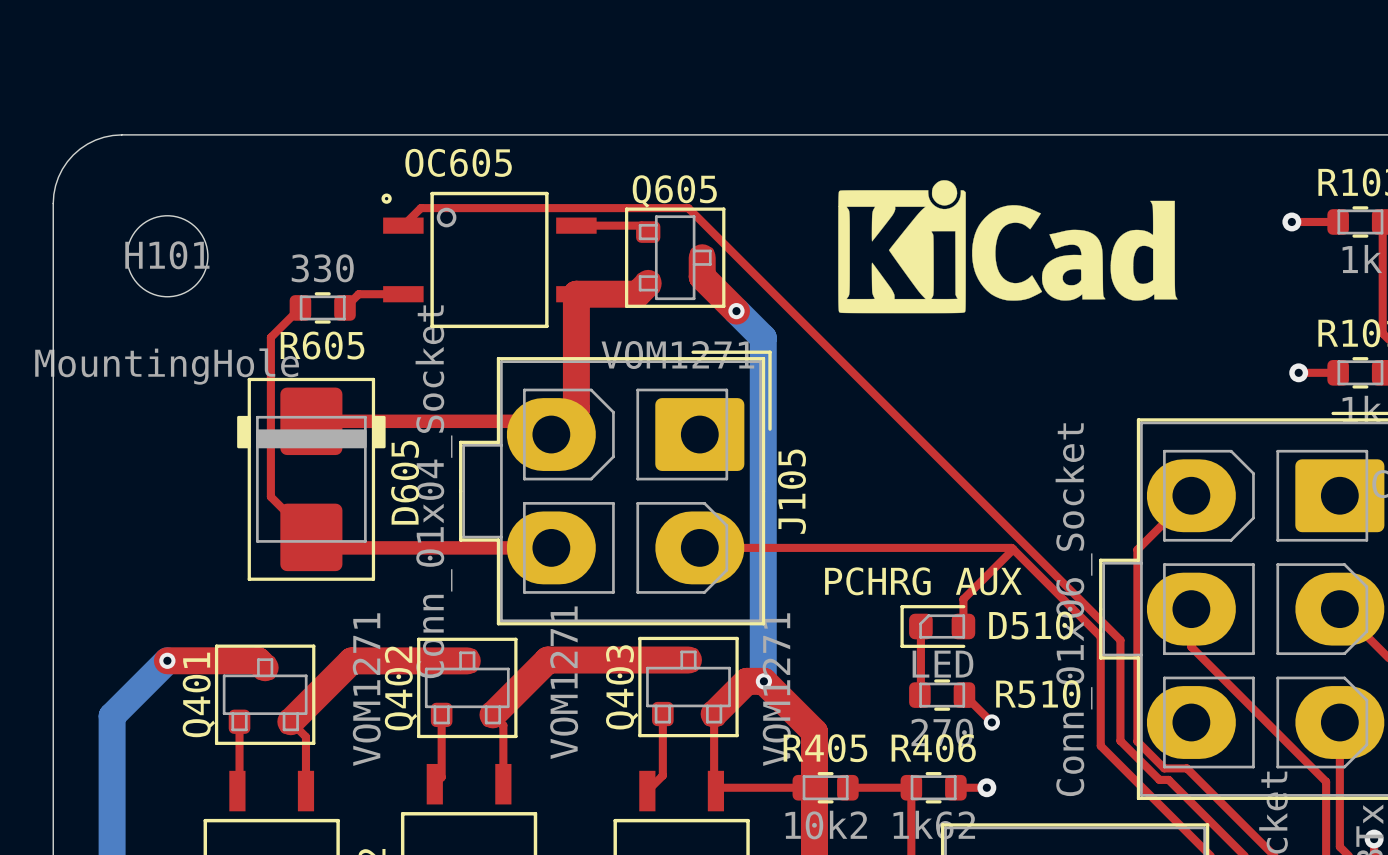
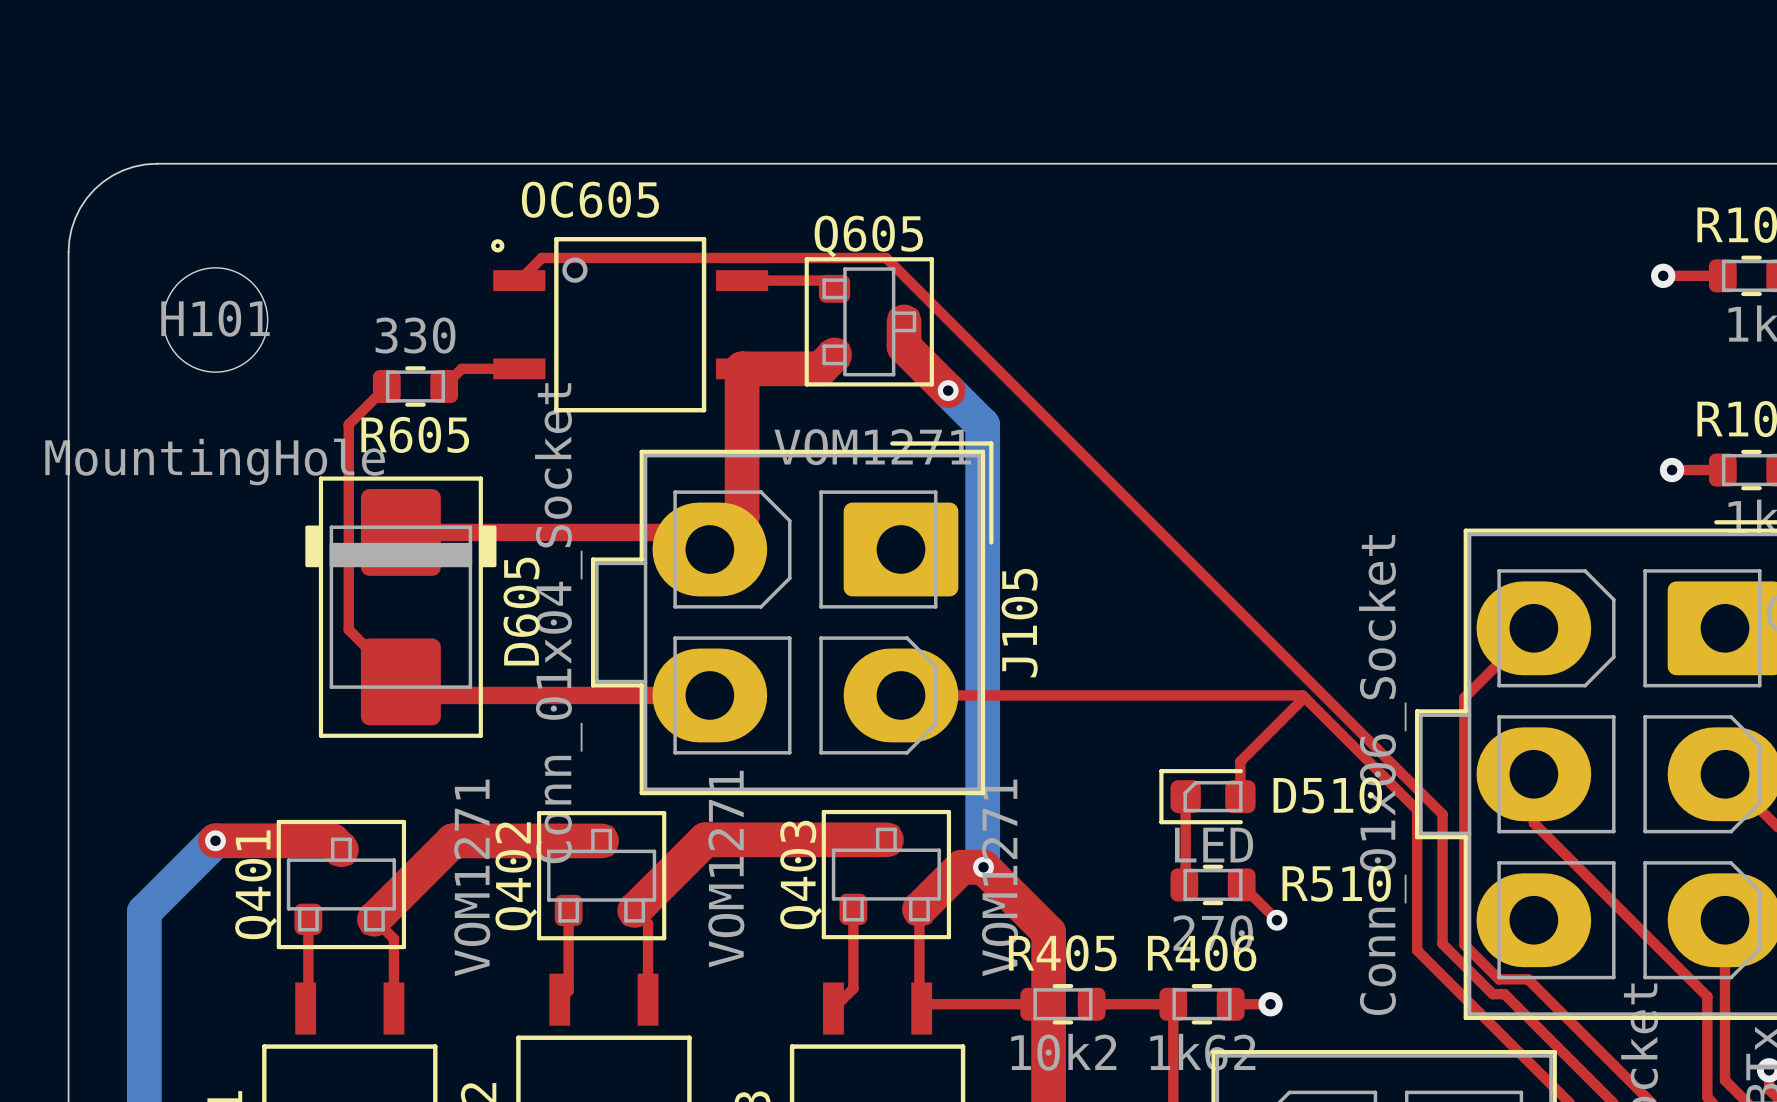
drawing: [838, 180, 1178, 314] -> none
text: PCHRG AUX (923, 581) -> none

